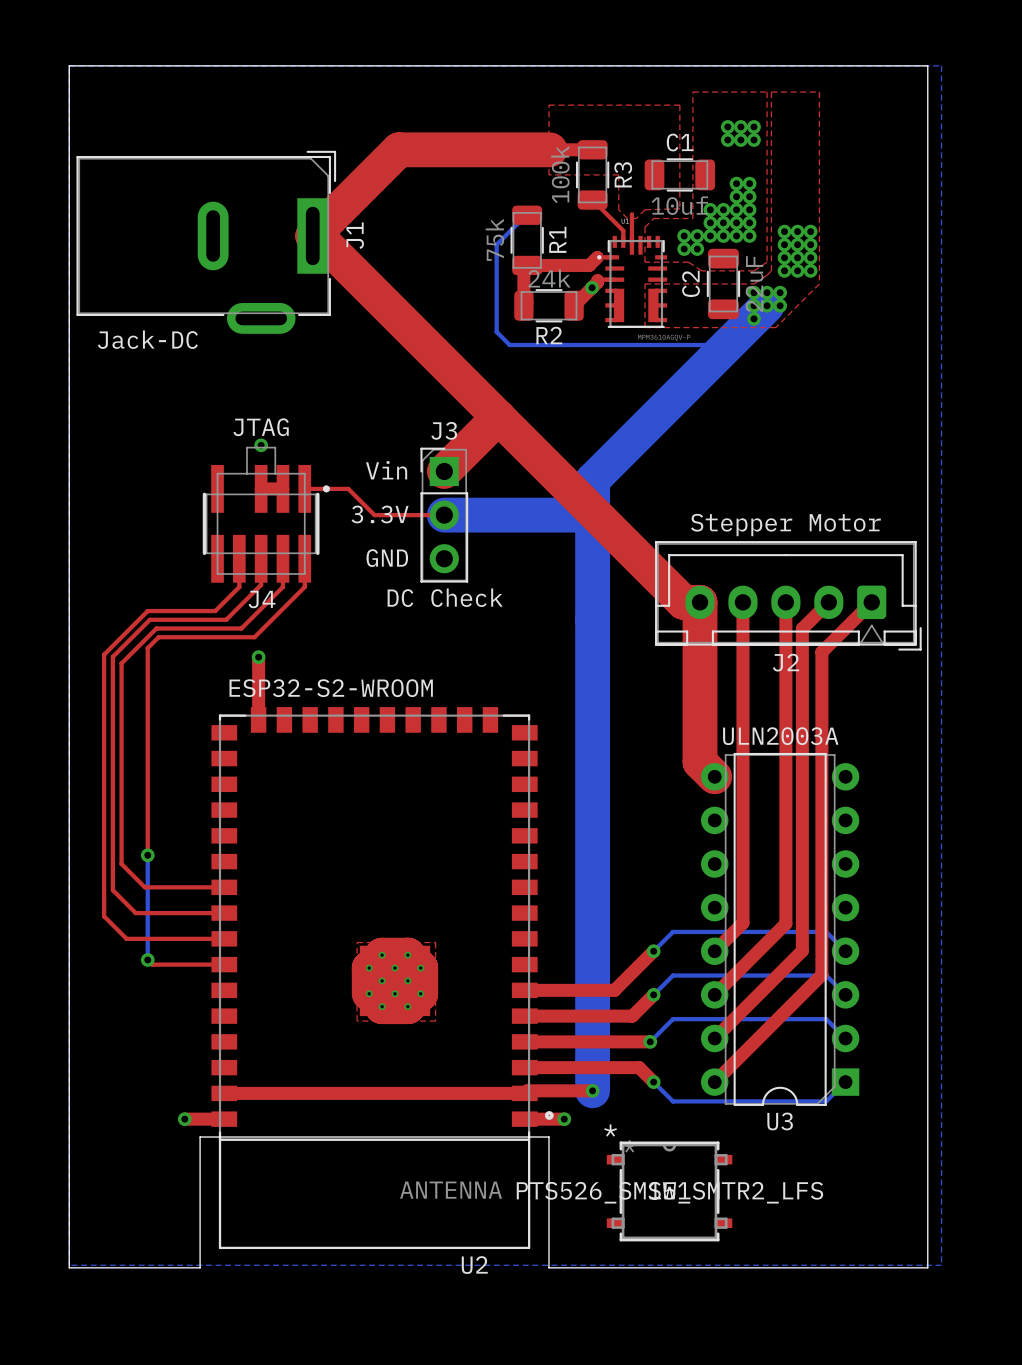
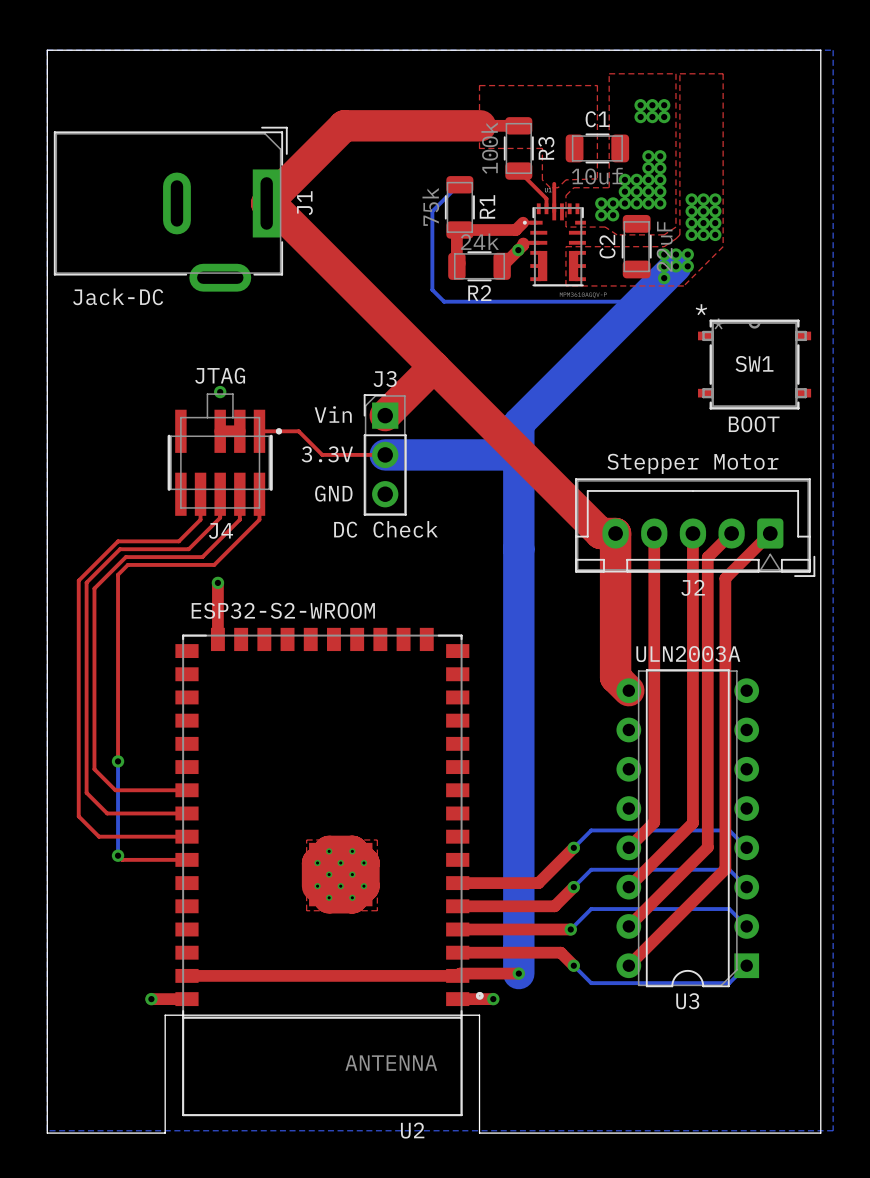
SW1 position: (669, 1191) -> (754, 364)
SW1 value: PTS526_SM15_SMTR2_LFS (669, 1192) -> BOOT (754, 424)

